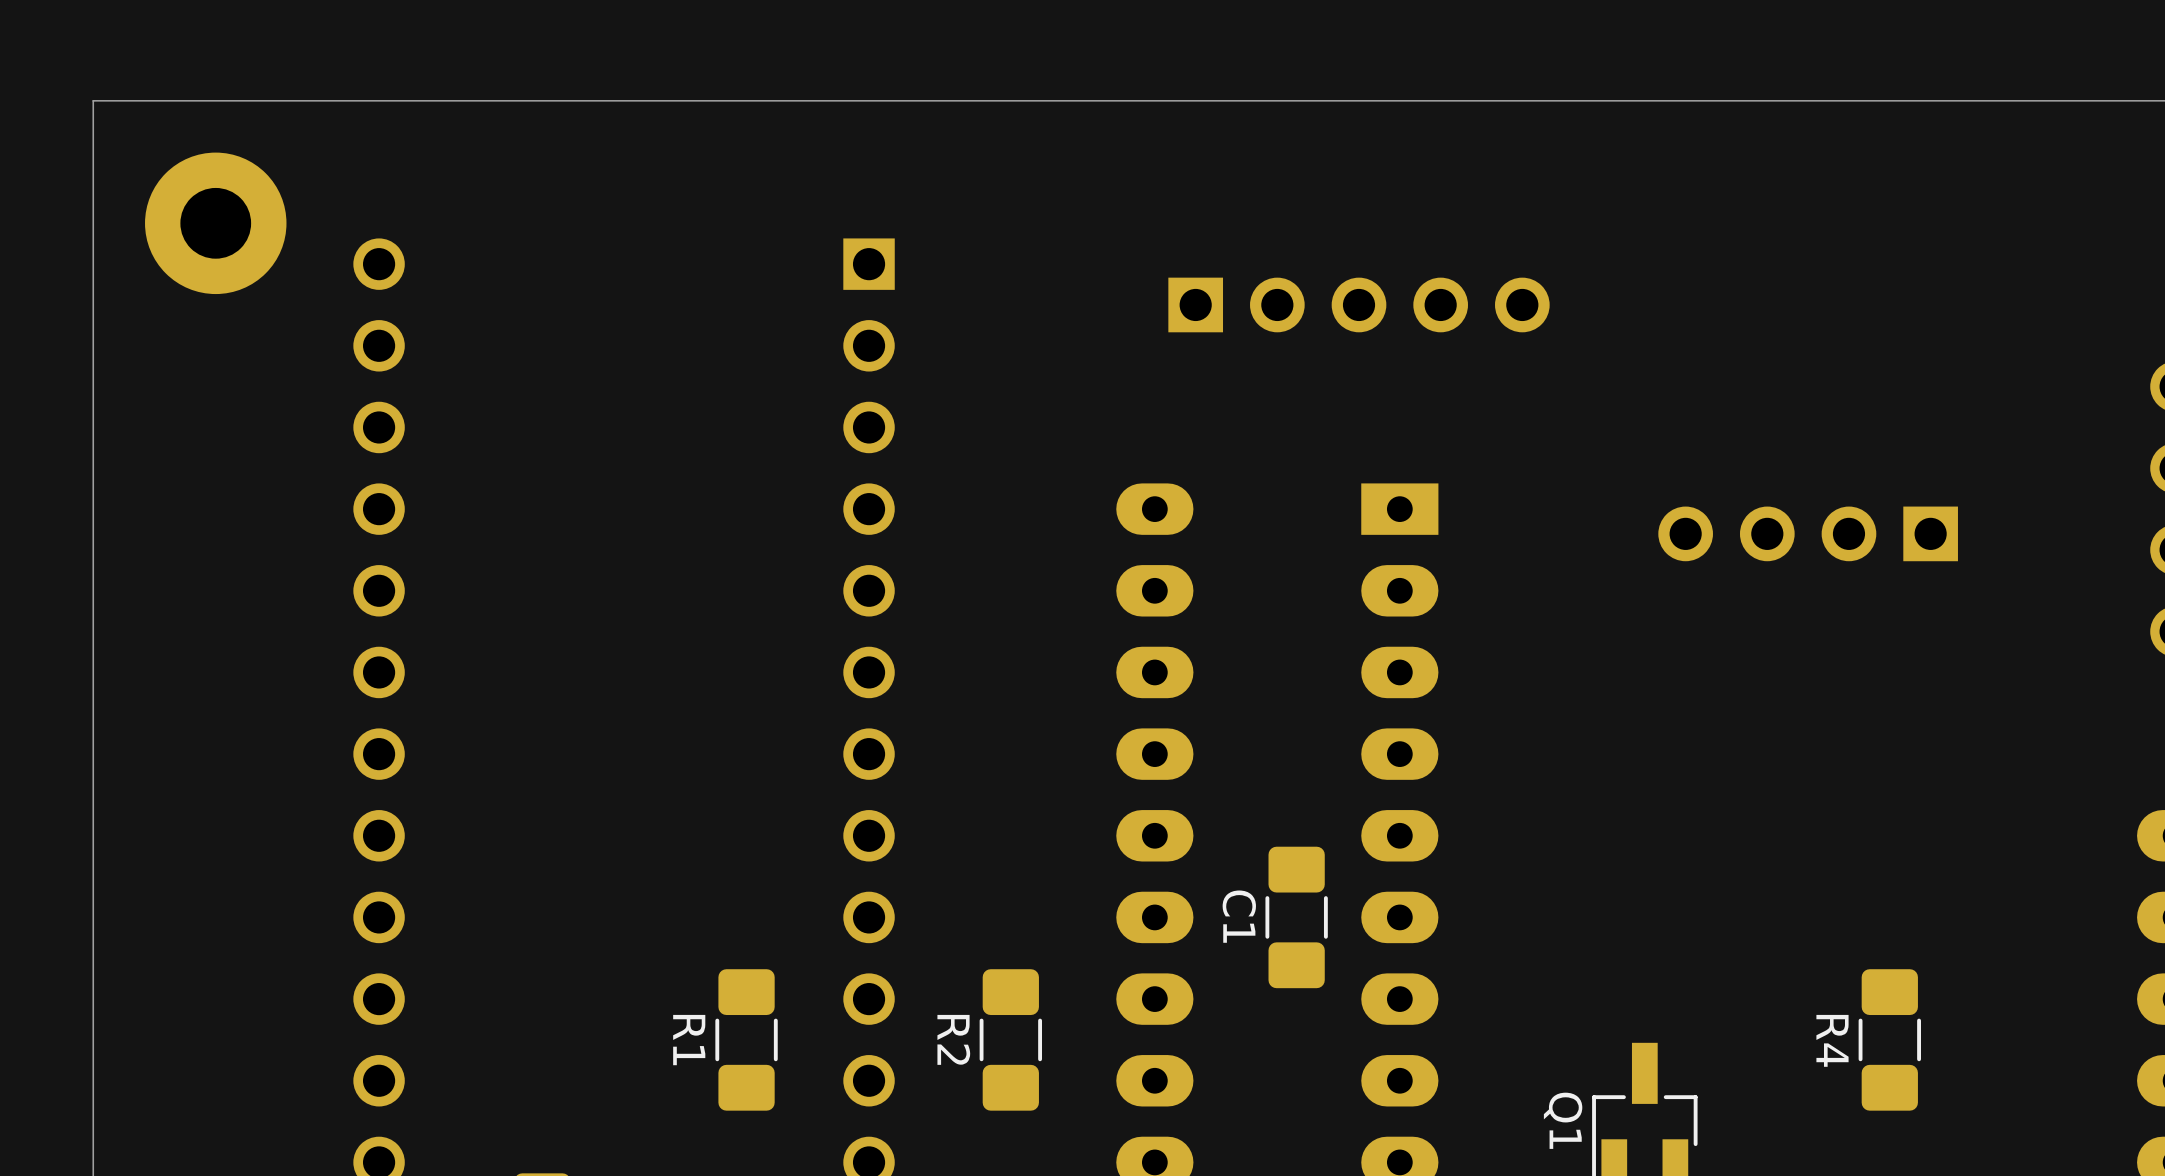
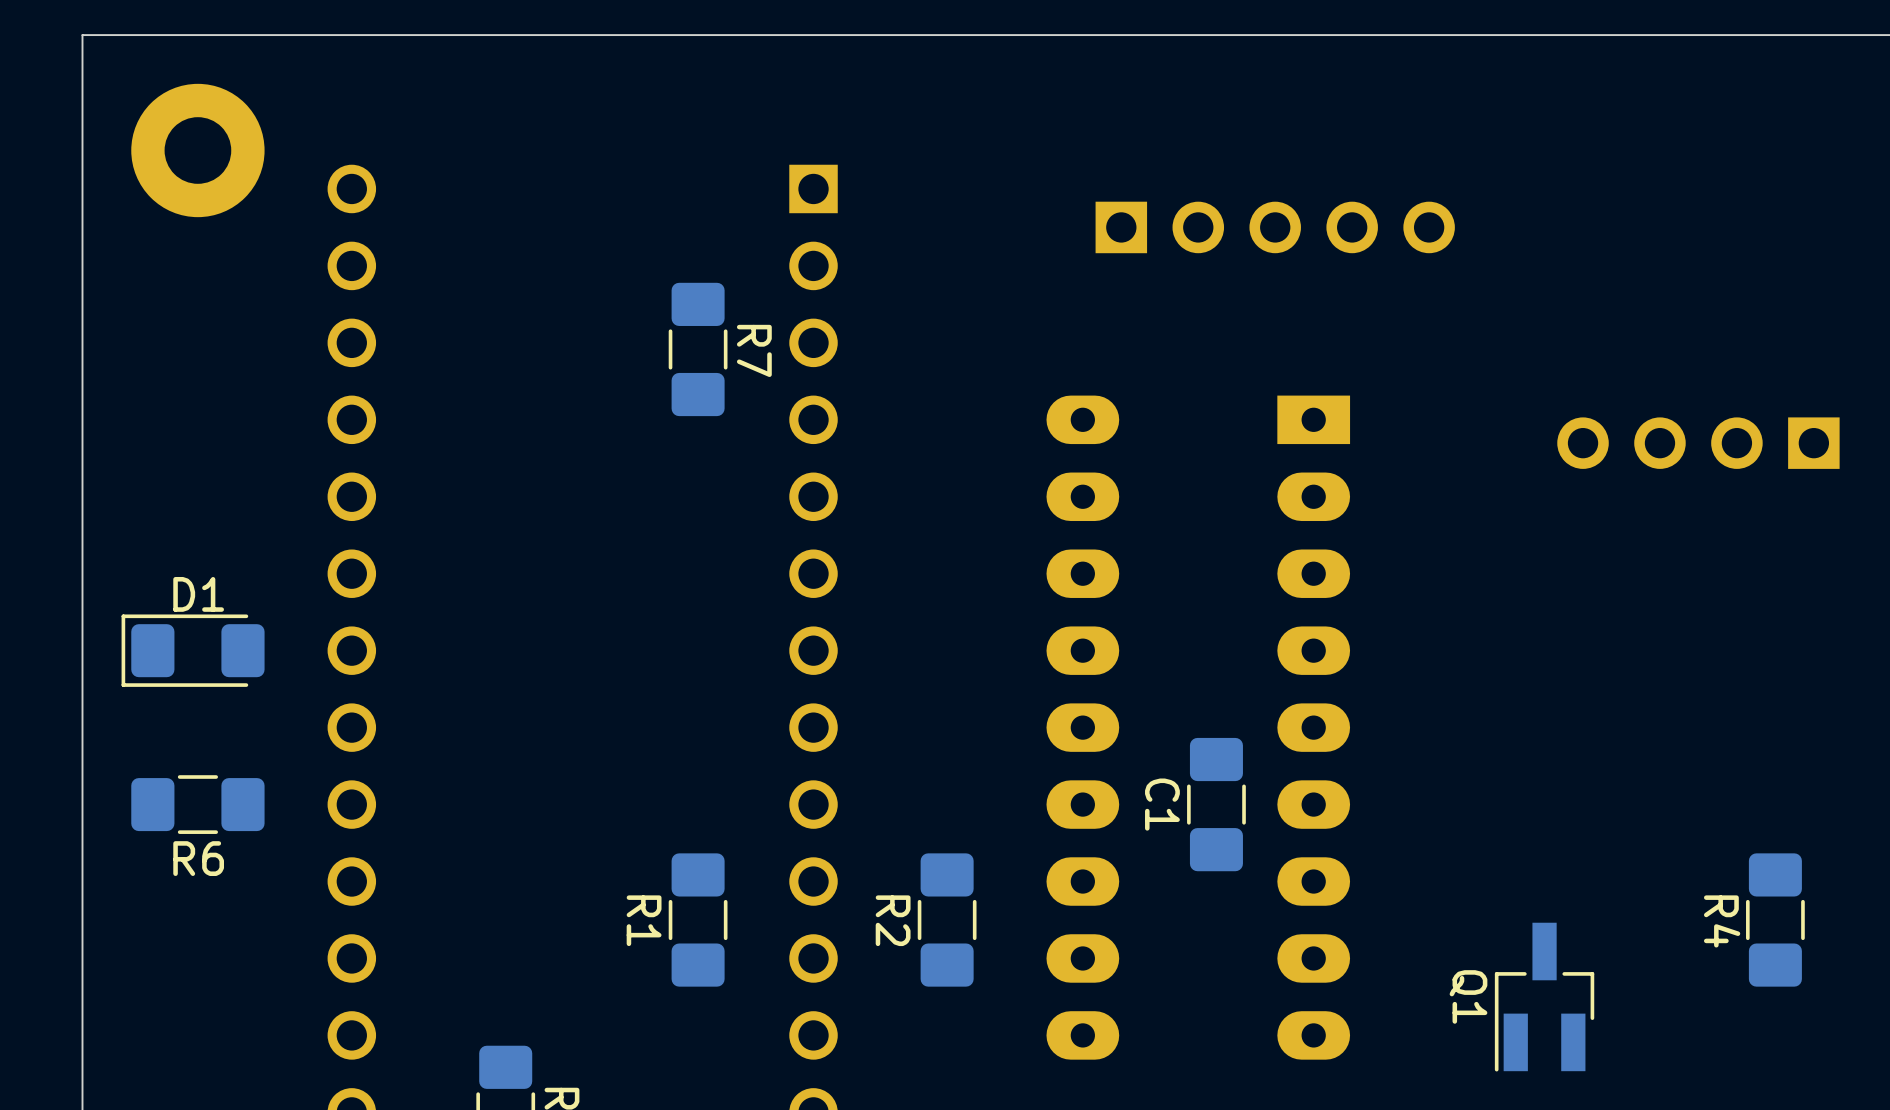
R7: none -> (698, 349)
D1: none -> (193, 650)
R6: none -> (197, 804)

